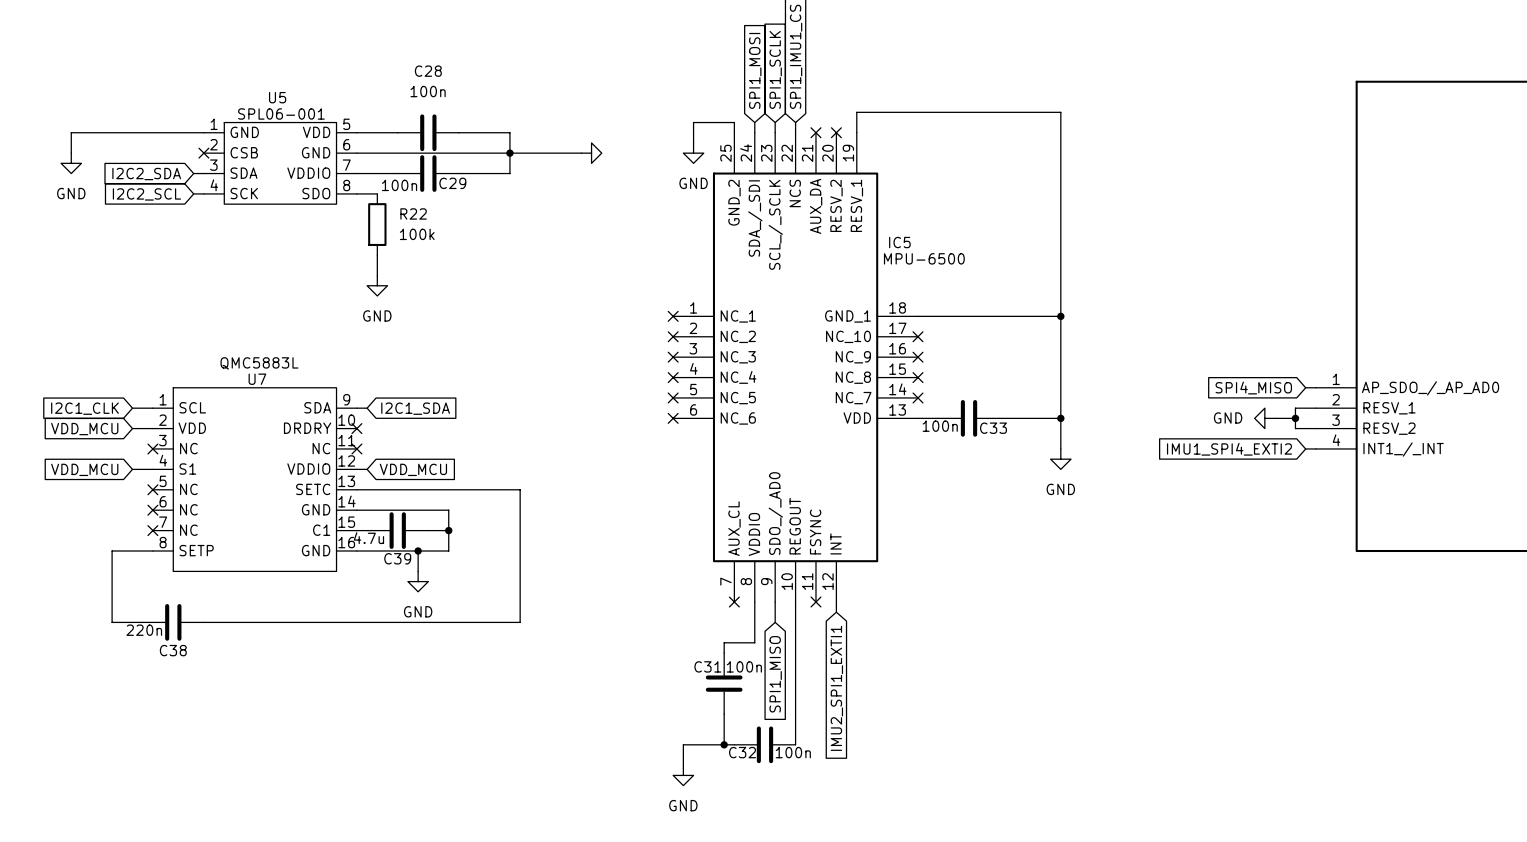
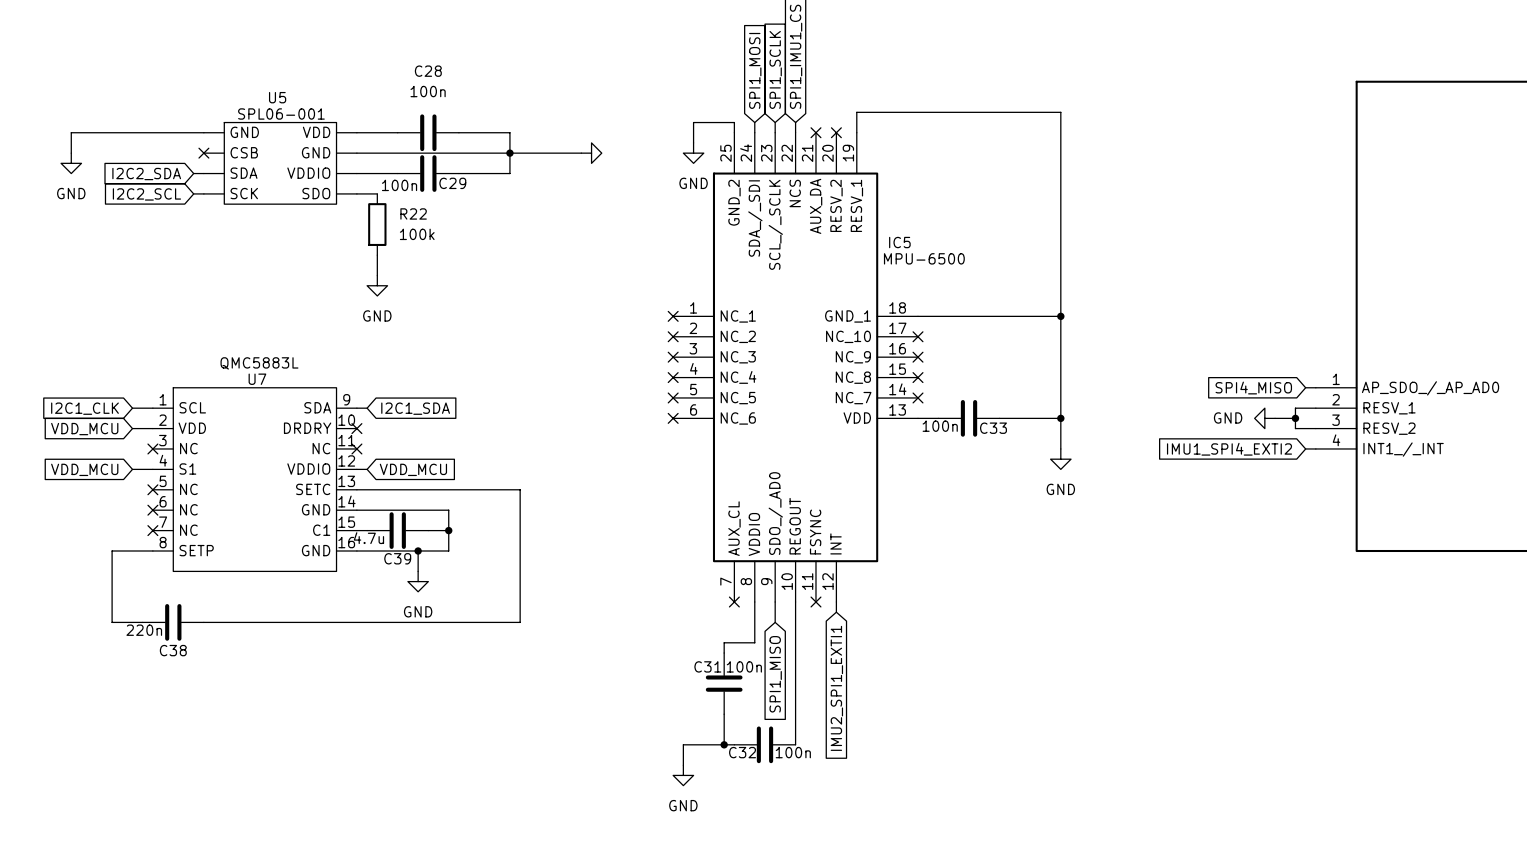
U5 pin number: 1 (214, 124) -> none
U5 pin number: 5 (346, 124) -> none
U5 pin number: 2 (213, 144) -> none
U5 pin number: 6 (346, 144) -> none
U5 pin number: 3 (213, 165) -> none
U5 pin number: 7 (346, 165) -> none
U5 pin number: 4 (214, 185) -> none
U5 pin number: 8 (346, 185) -> none

